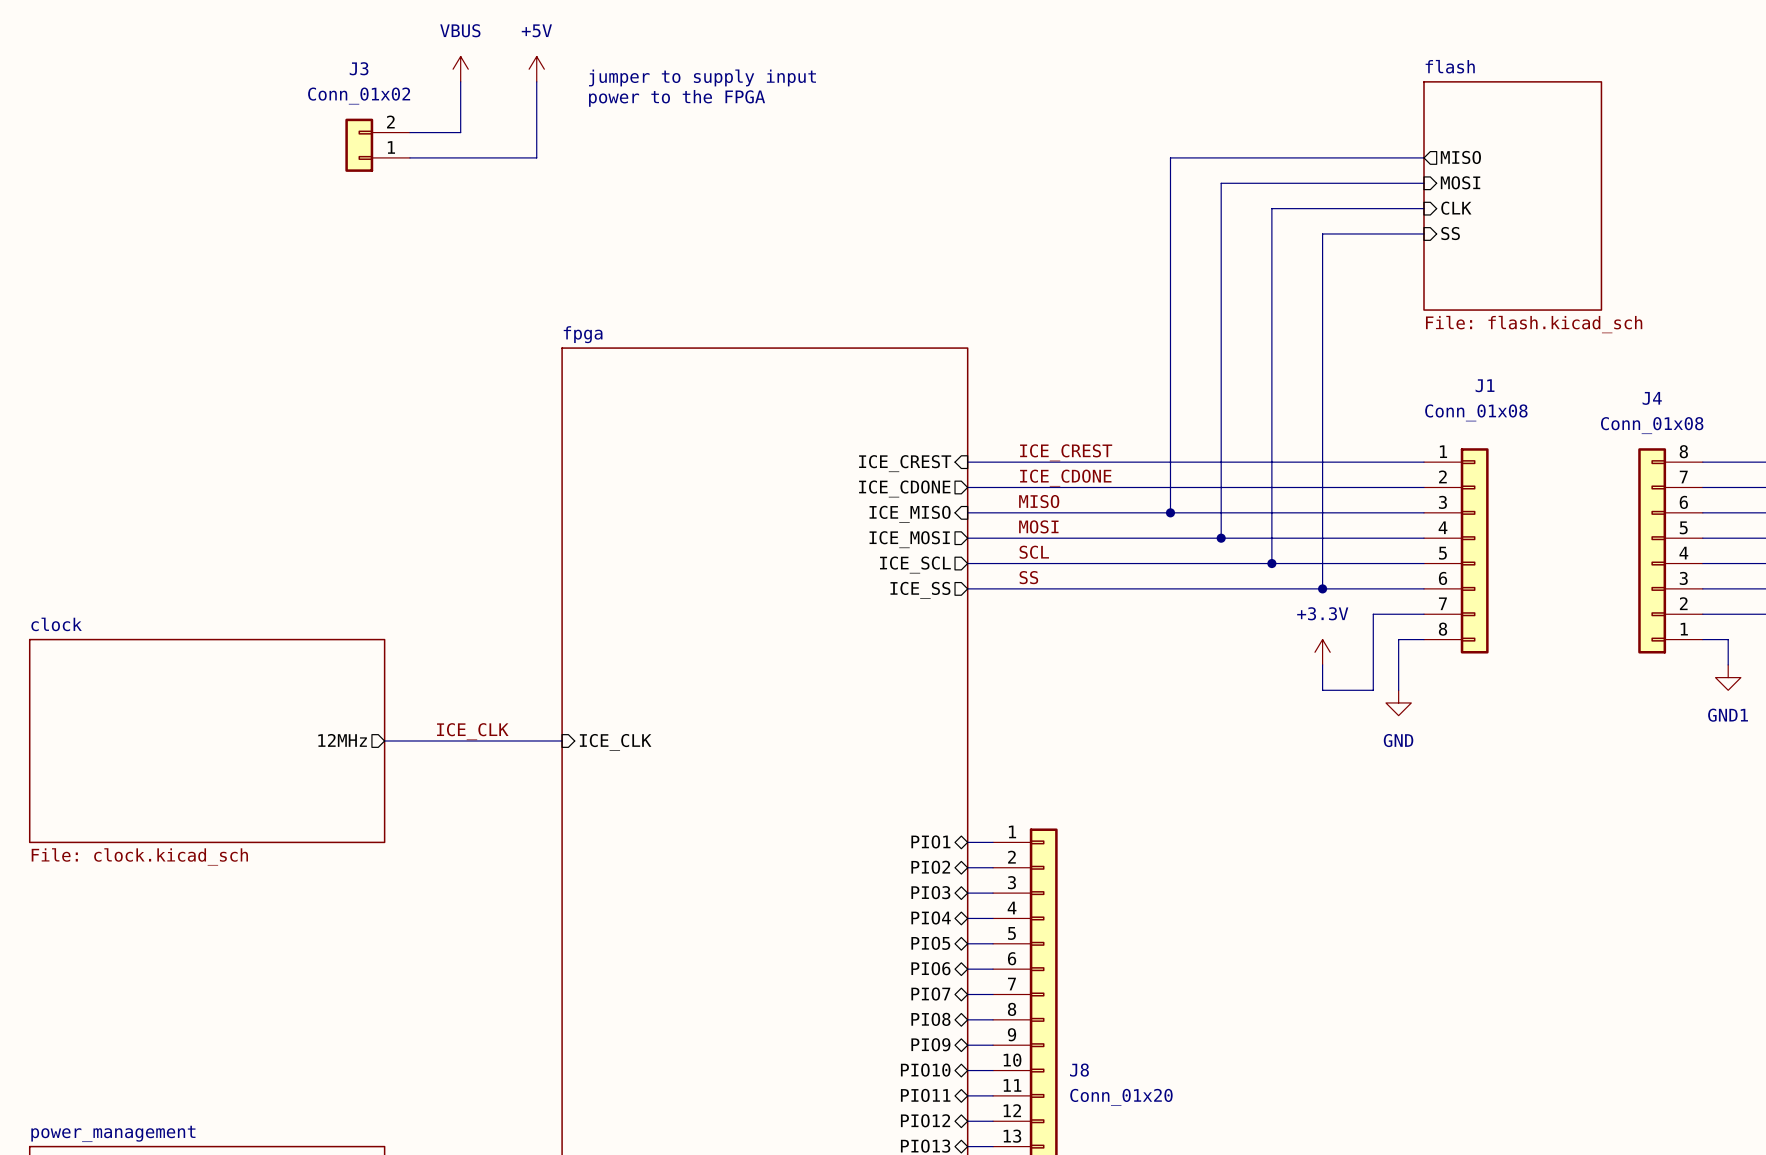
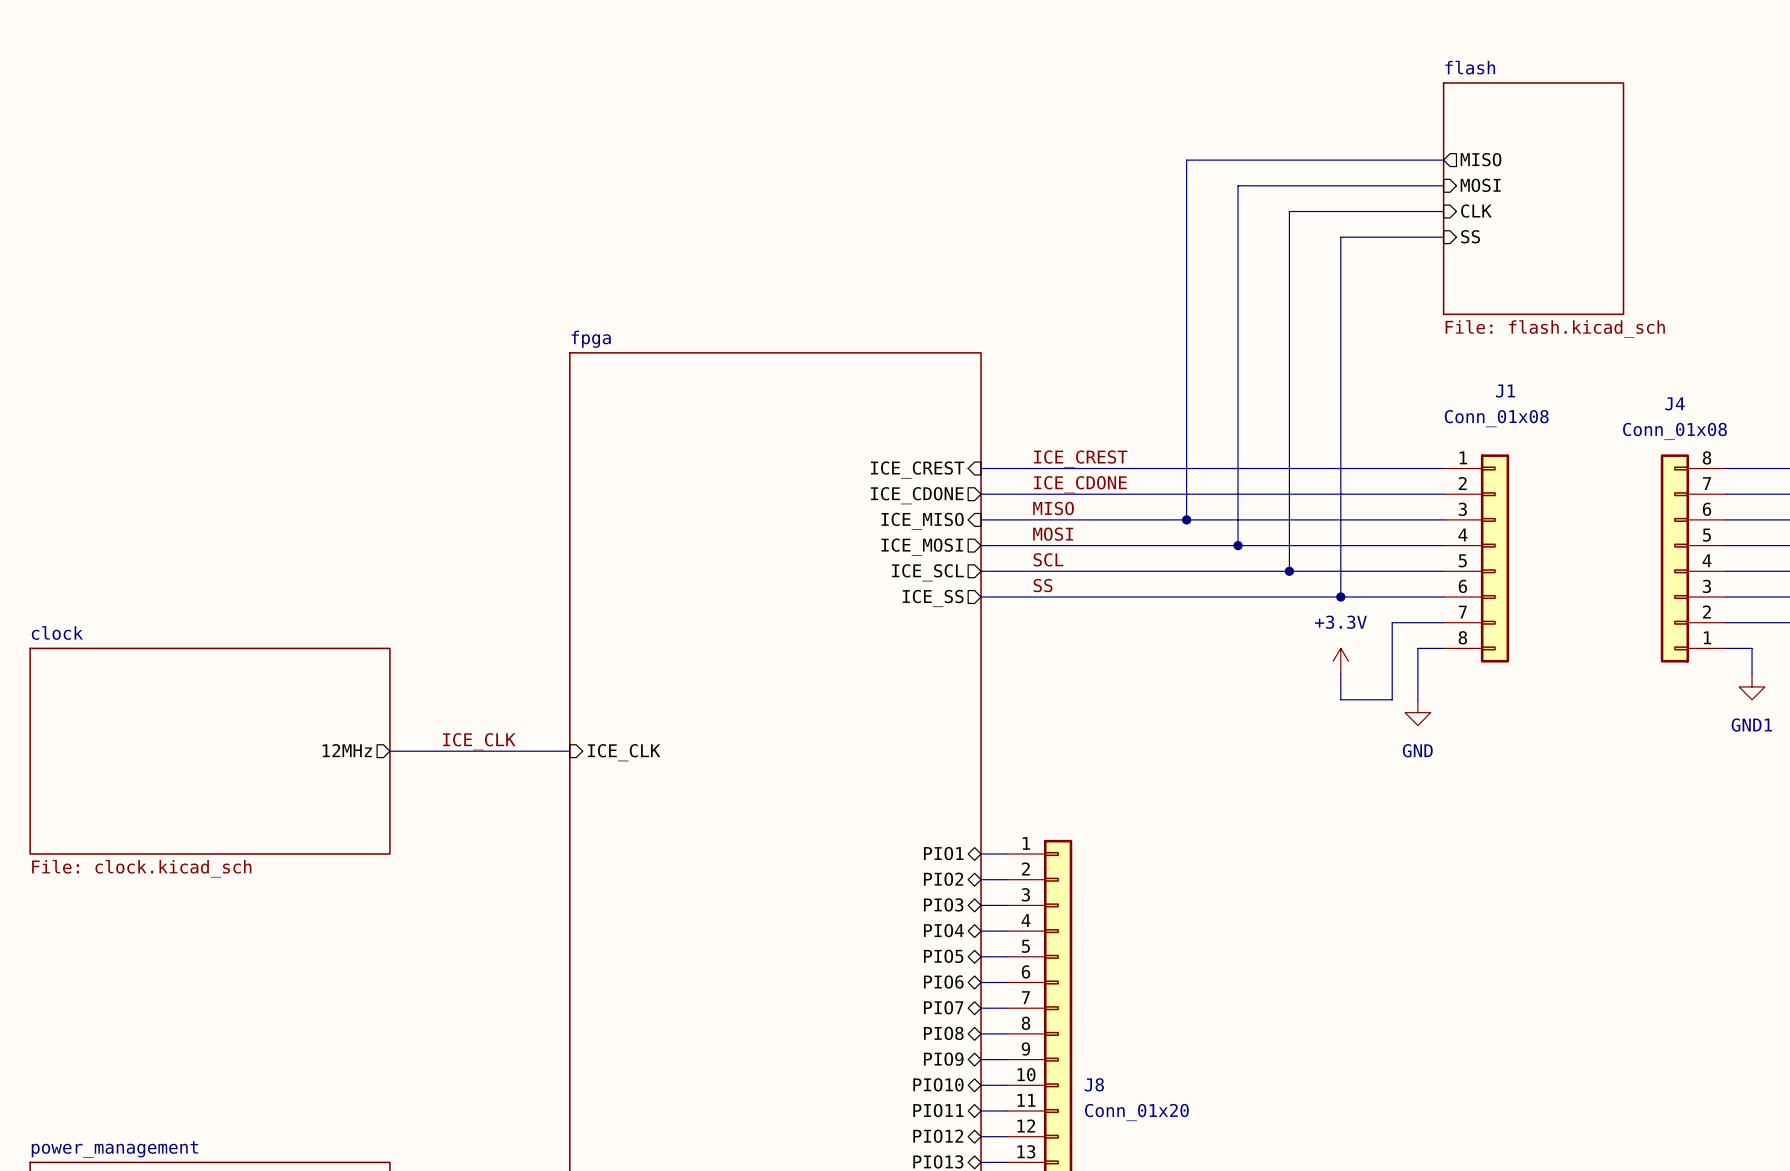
power symbol: VBUS (460, 69) -> none
power symbol: +5V (536, 69) -> none
text: jumper to supply input (702, 77) -> none
wire: (460, 81) (460, 132) (409, 132) -> none
wire: (536, 81) (536, 157) (409, 157) -> none
text: power to the FPGA (677, 98) -> none
J3: Conn_01x02 (377, 145) -> none

